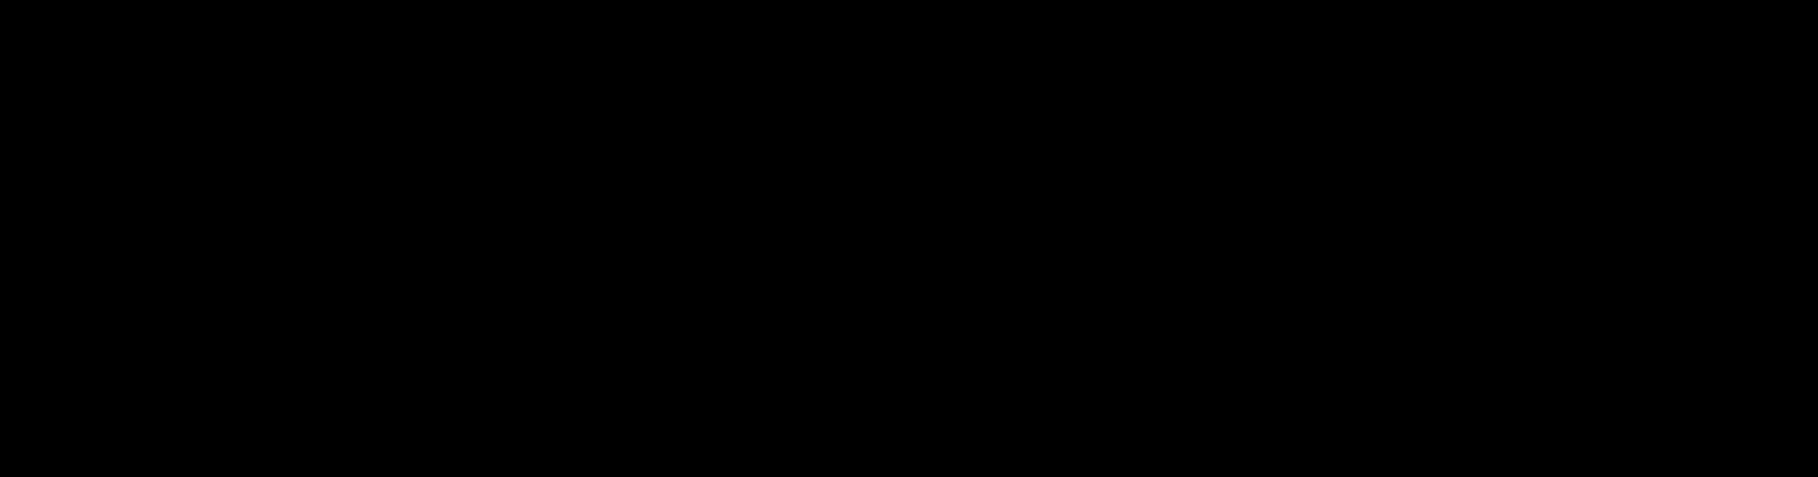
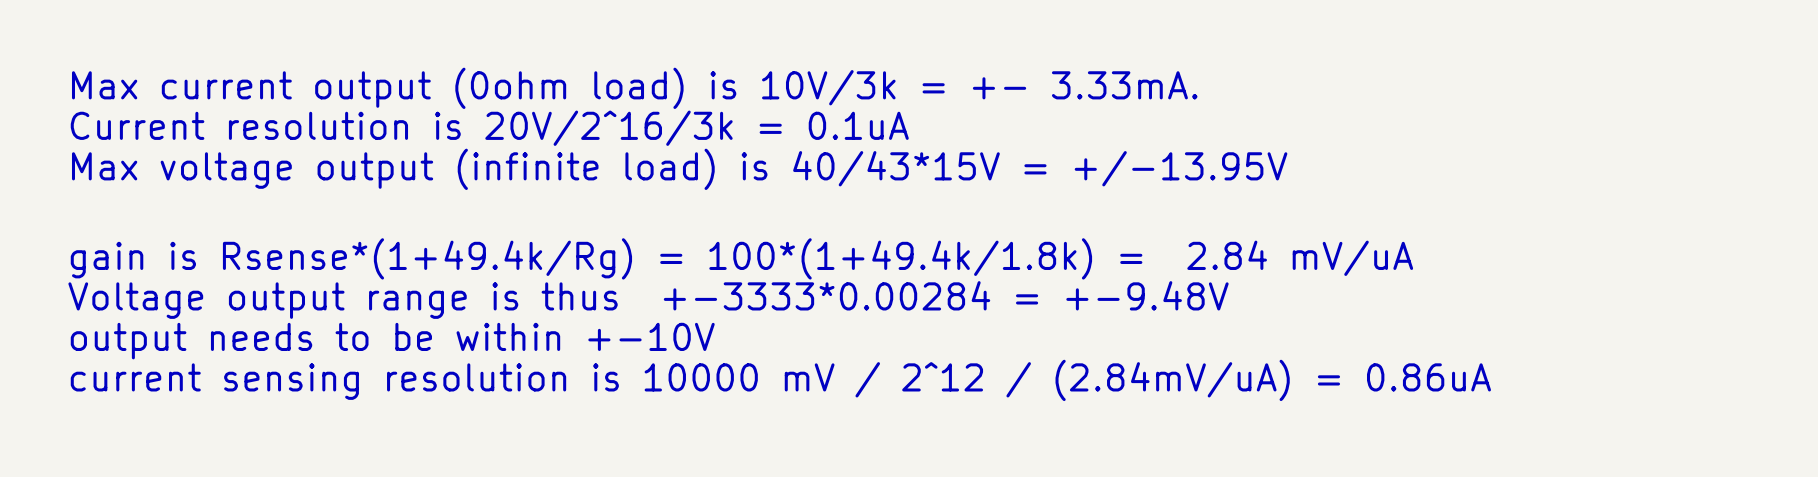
text: none -> Max current output (0ohm load) is 10V/3k = +- 3.33mA. (634, 88)
text: none -> Current resolution is 20V/2^16/3k = 0.1uA (489, 128)
text: none -> Max voltage output (infinite load) is 40/43*15V = +/-13.95V (679, 169)
text: none -> gain is Rsense*(1+49.4k/Rg) = 100*(1+49.4k/1.8k) = 2.84 mV/uA (741, 258)
text: none -> Voltage output range is thus +-3333*0.00284 = +-9.48V (648, 299)
text: none -> output needs to be within +-10V (392, 341)
text: none -> current sensing resolution is 10000 mV / 2^12 / (2.84mV/uA) = 0.86uA (780, 380)

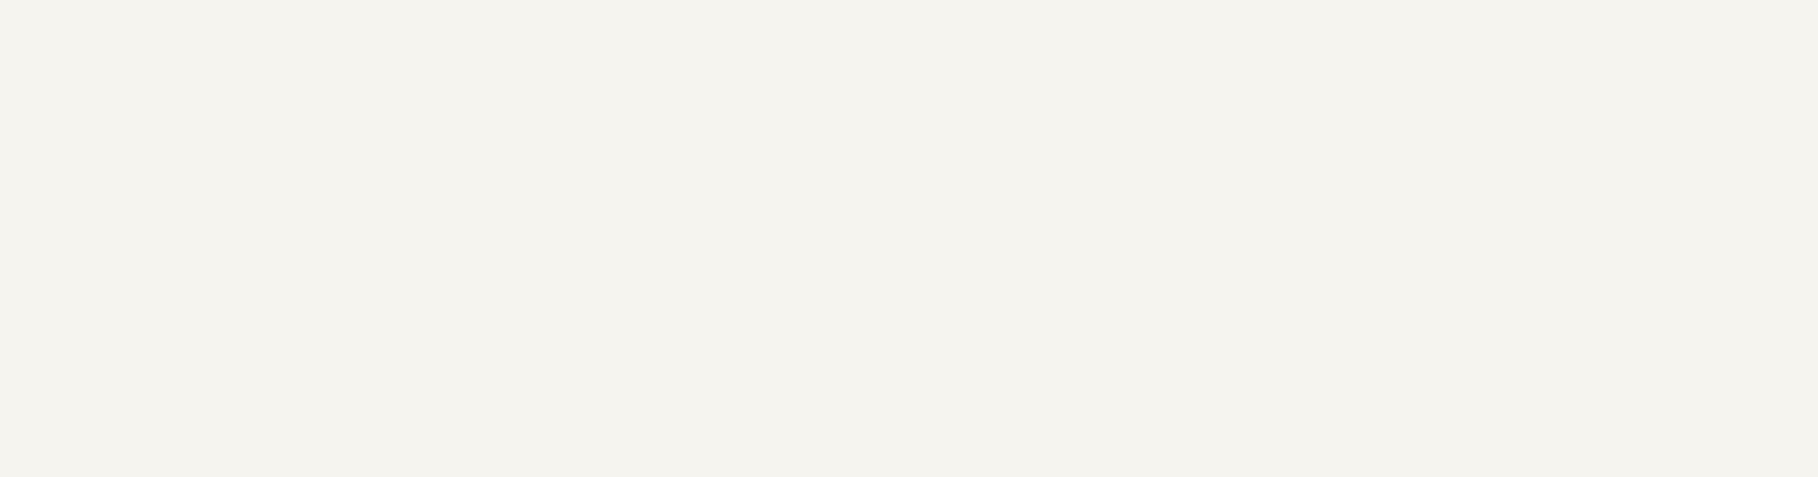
text: Max current output (0ohm load) is 10V/3k = +- 3.33mA. (634, 88) -> none
text: Current resolution is 20V/2^16/3k = 0.1uA (489, 128) -> none
text: Max voltage output (infinite load) is 40/43*15V = +/-13.95V (679, 169) -> none
text: gain is Rsense*(1+49.4k/Rg) = 100*(1+49.4k/1.8k) = 2.84 mV/uA (741, 258) -> none
text: Voltage output range is thus +-3333*0.00284 = +-9.48V (648, 299) -> none
text: output needs to be within +-10V (392, 341) -> none
text: current sensing resolution is 10000 mV / 2^12 / (2.84mV/uA) = 0.86uA (780, 380) -> none

